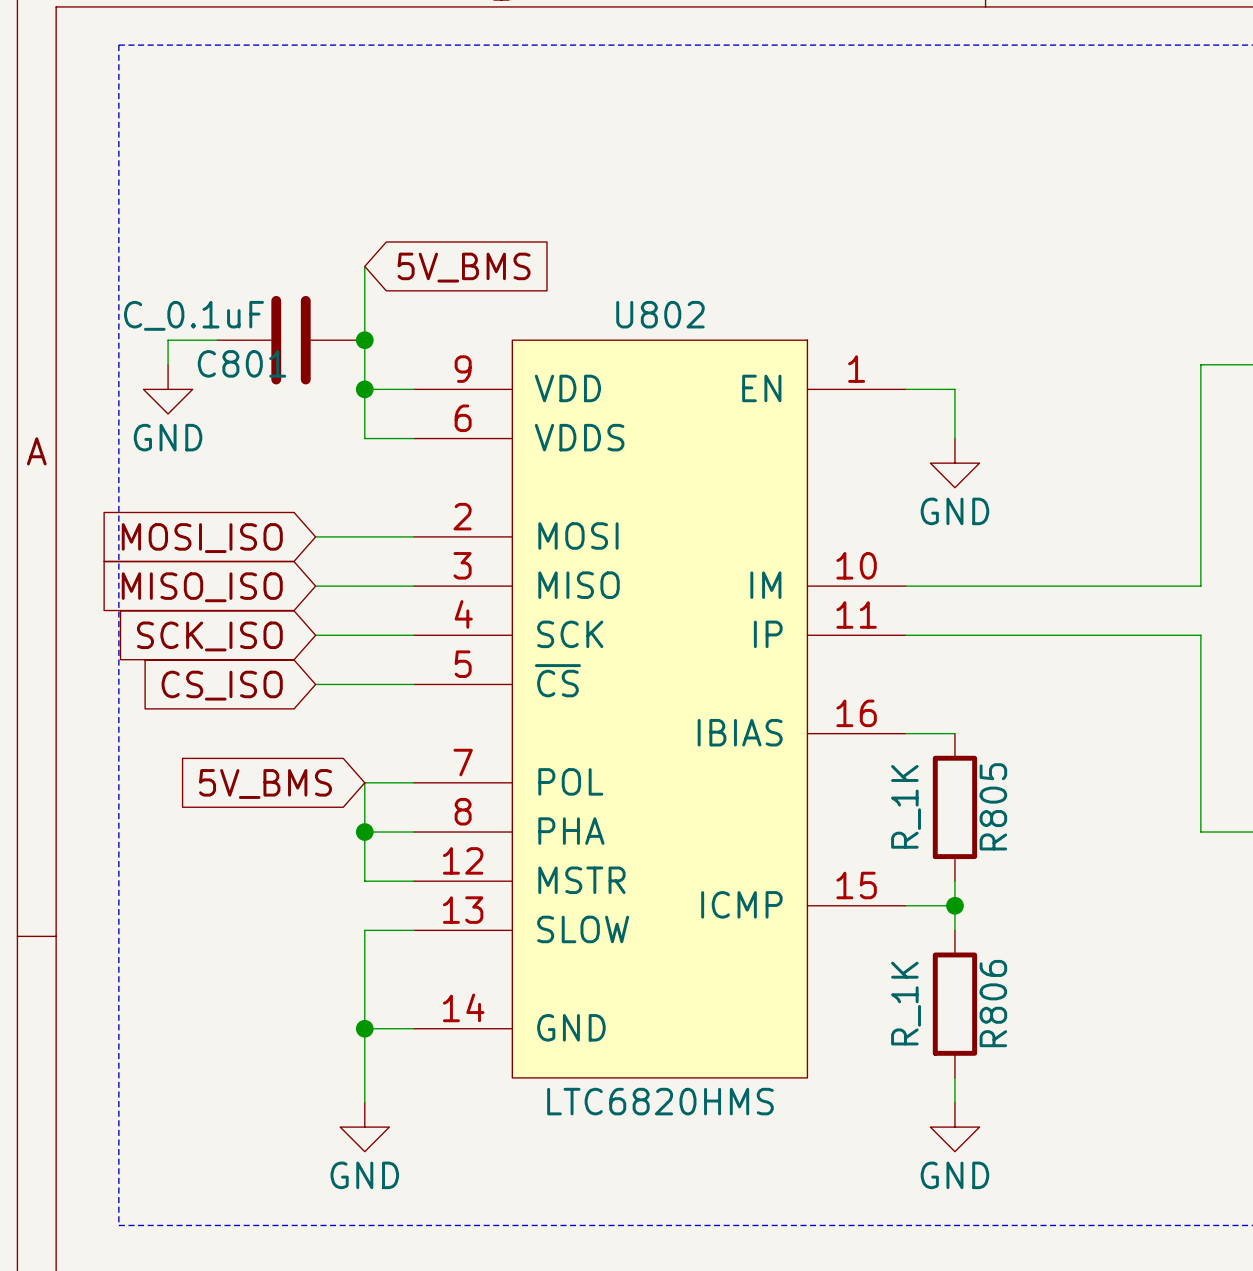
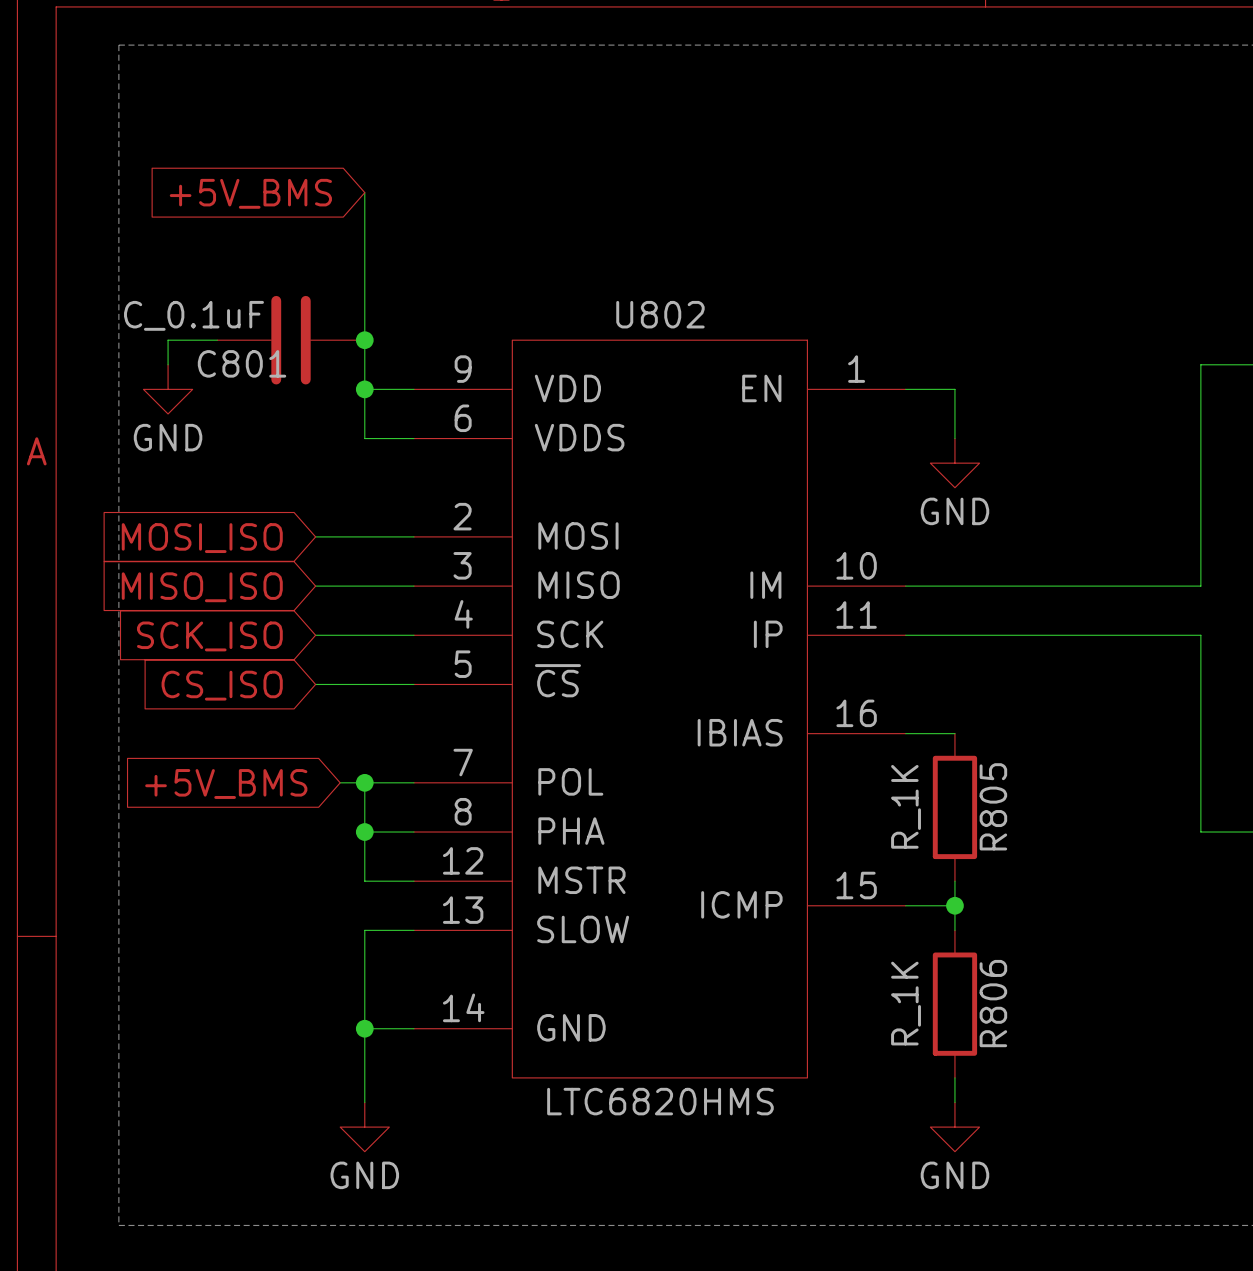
wire: none -> (364, 192) (364, 266)
global label: none -> +5V_BMS (250, 193)
global label: 5V_BMS (464, 267) -> none
wire: none -> (340, 782) (364, 782)
junction: none -> (364, 782)
global label: 5V_BMS (265, 784) -> +5V_BMS (226, 784)

